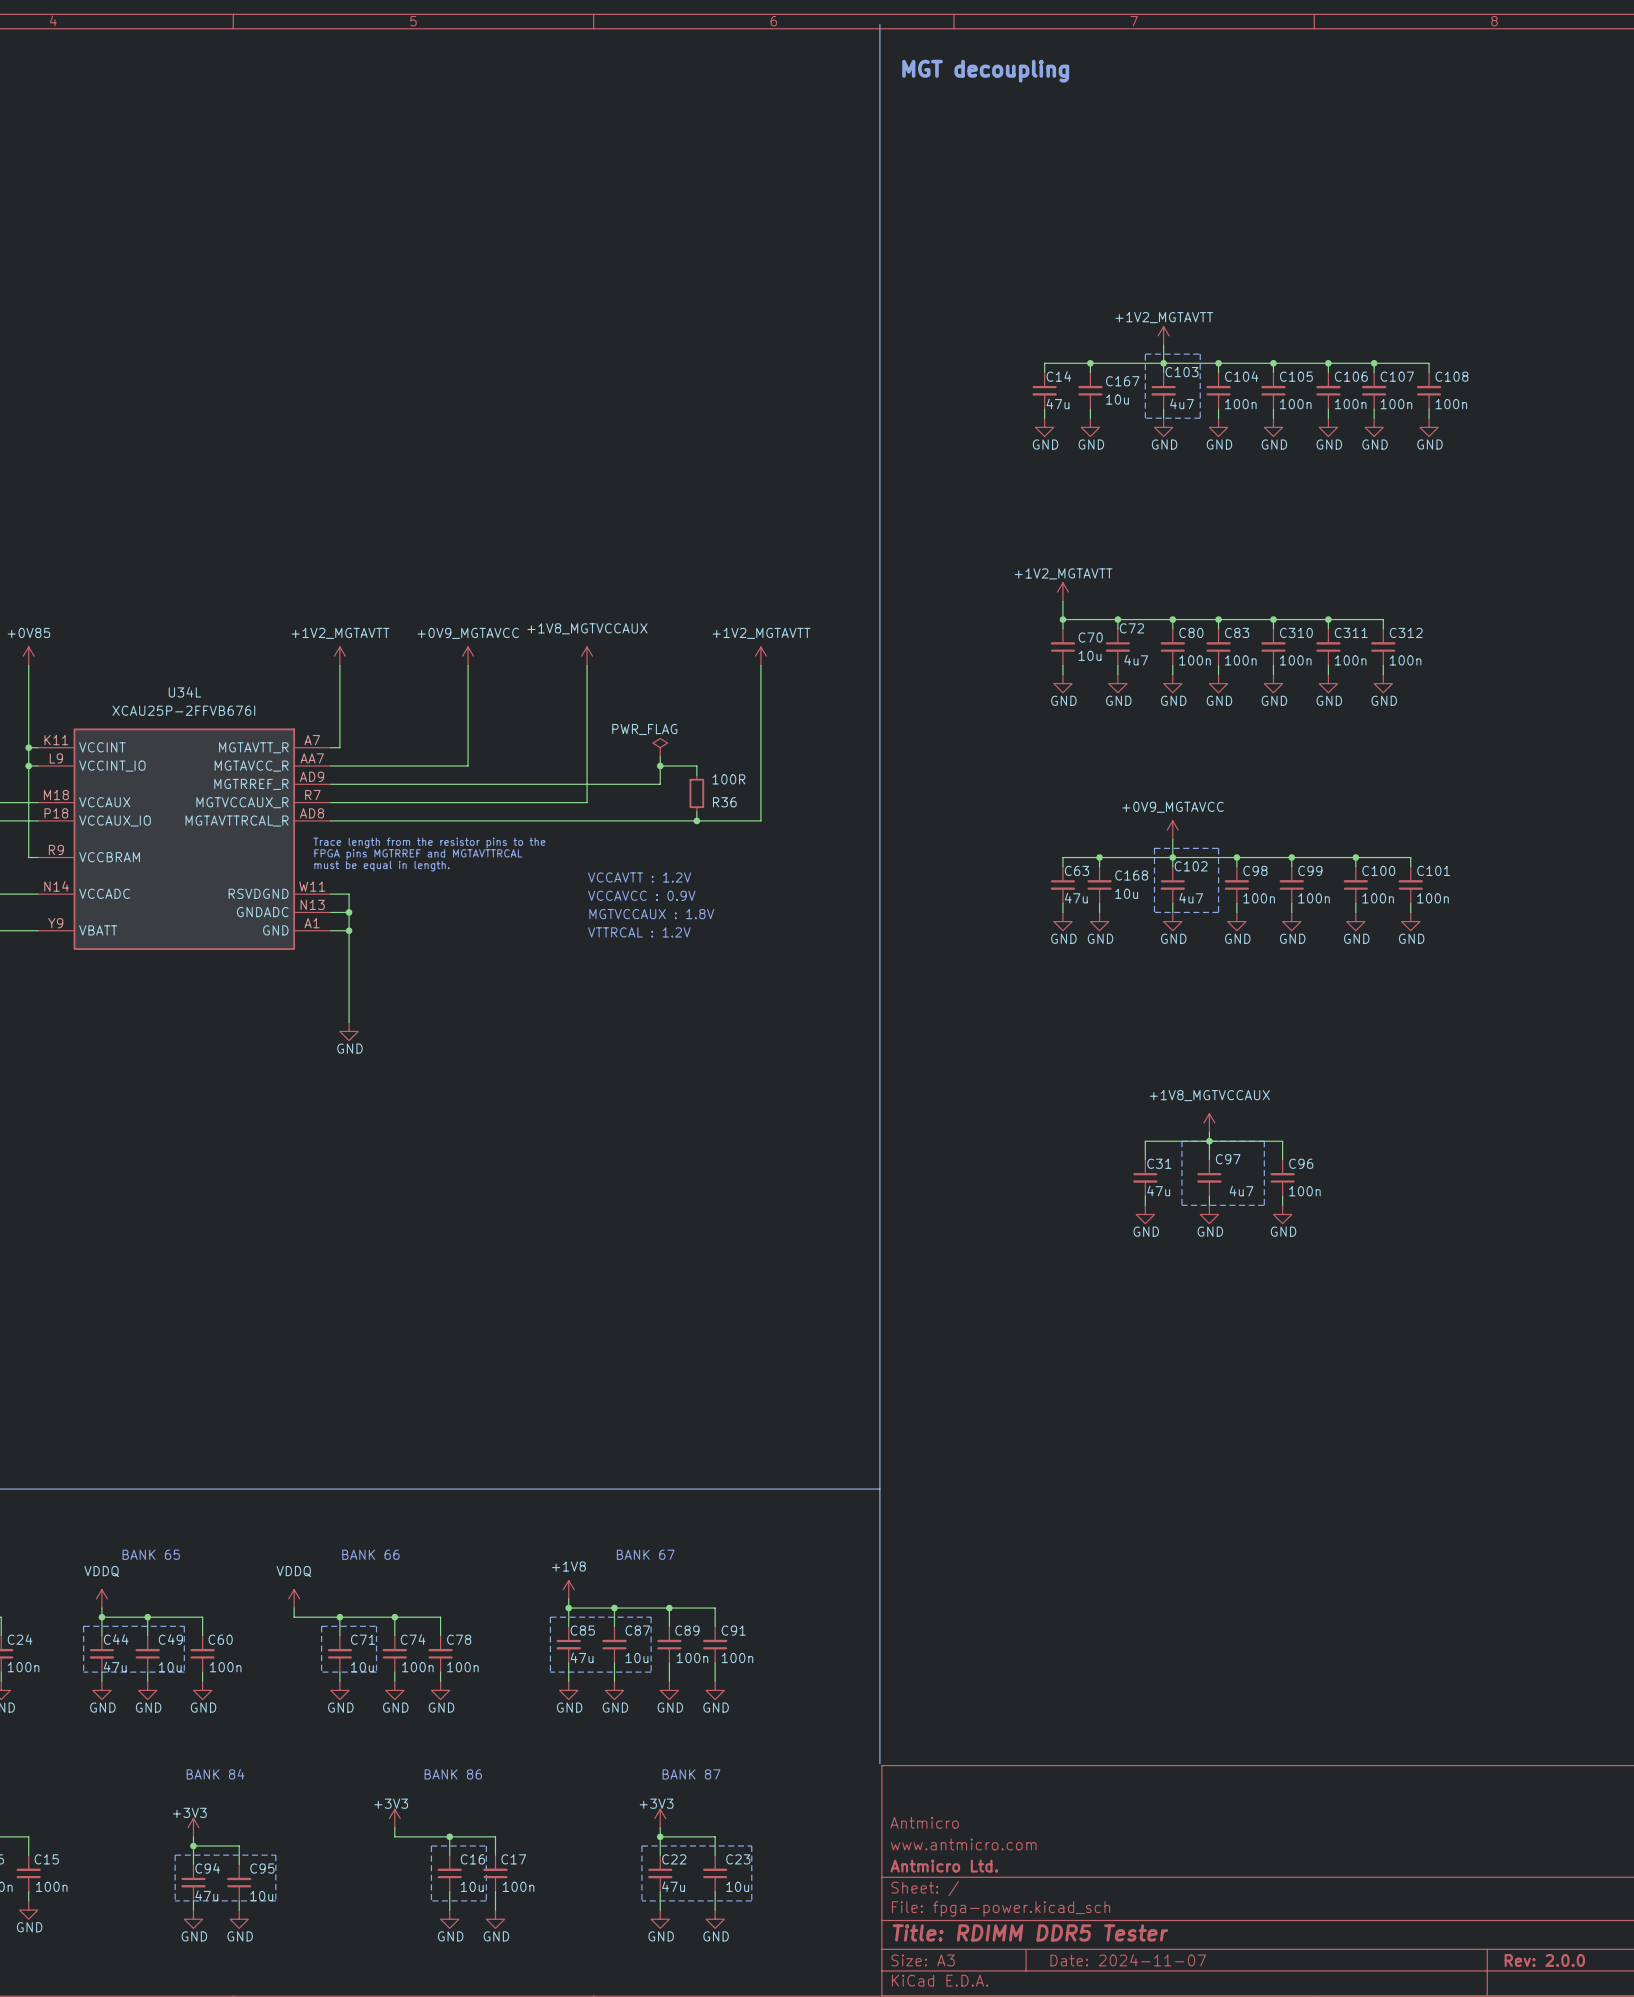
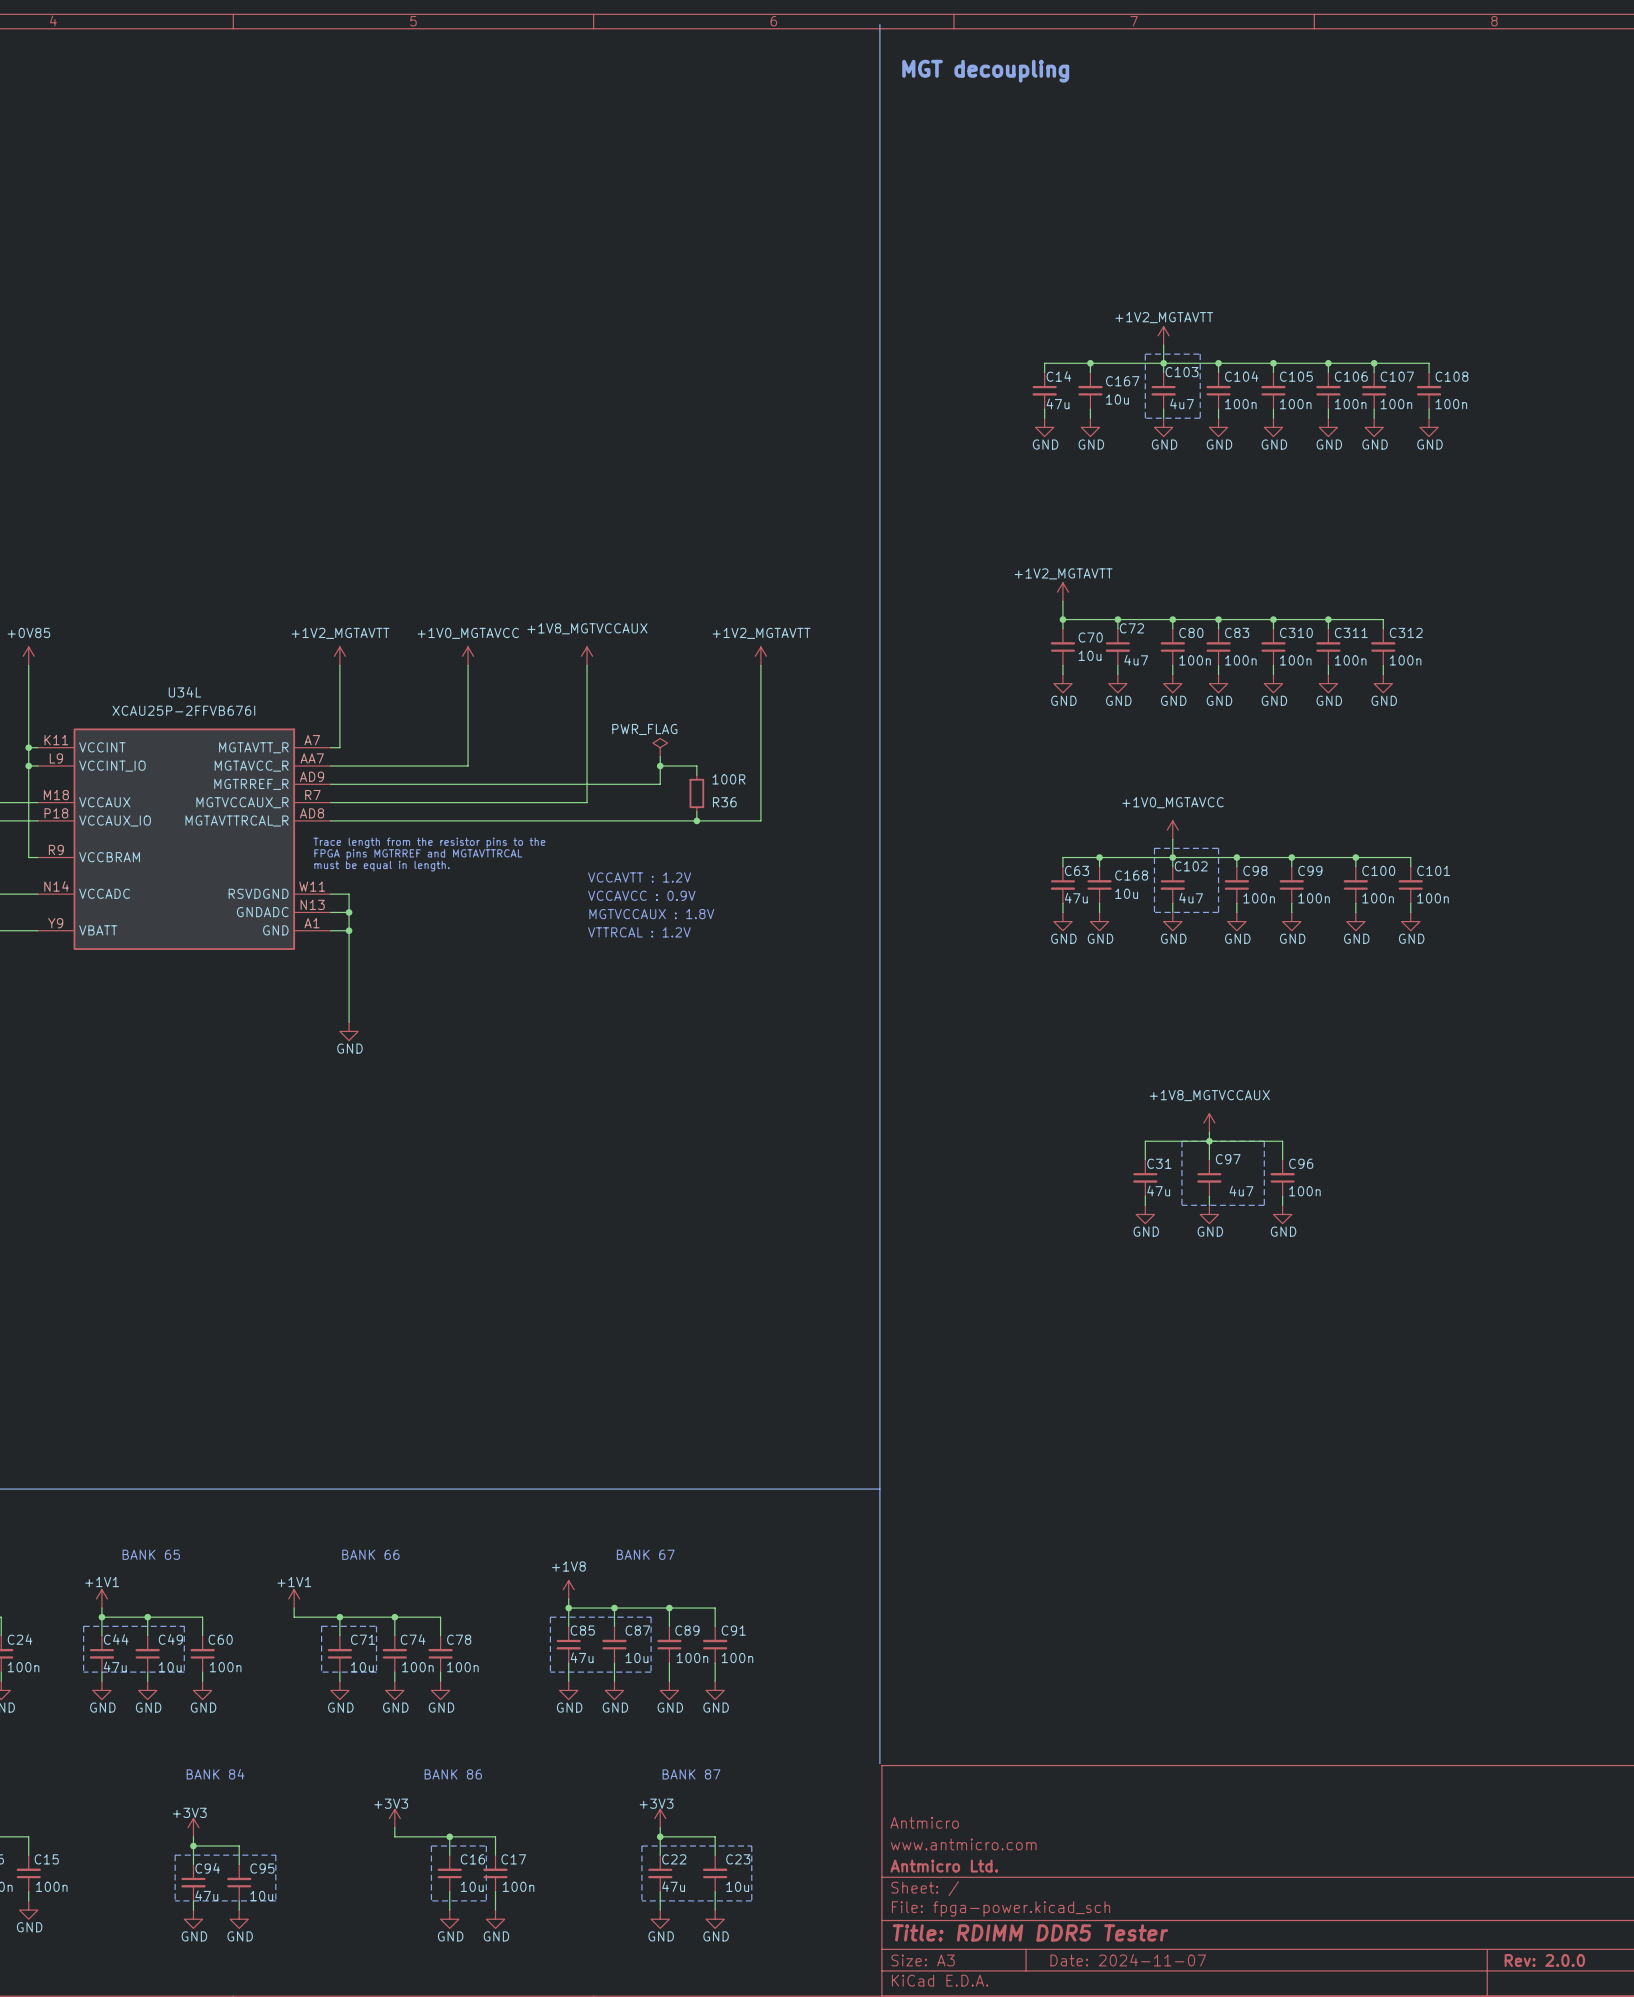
power symbol: +0V9_MGTAVCC (468, 656) -> +1V0_MGTAVCC (468, 656)
power symbol: +0V9_MGTAVCC (1172, 830) -> +1V0_MGTAVCC (1172, 830)
power symbol: VDDQ (101, 1598) -> +1V1 (101, 1598)
power symbol: VDDQ (294, 1598) -> +1V1 (294, 1598)

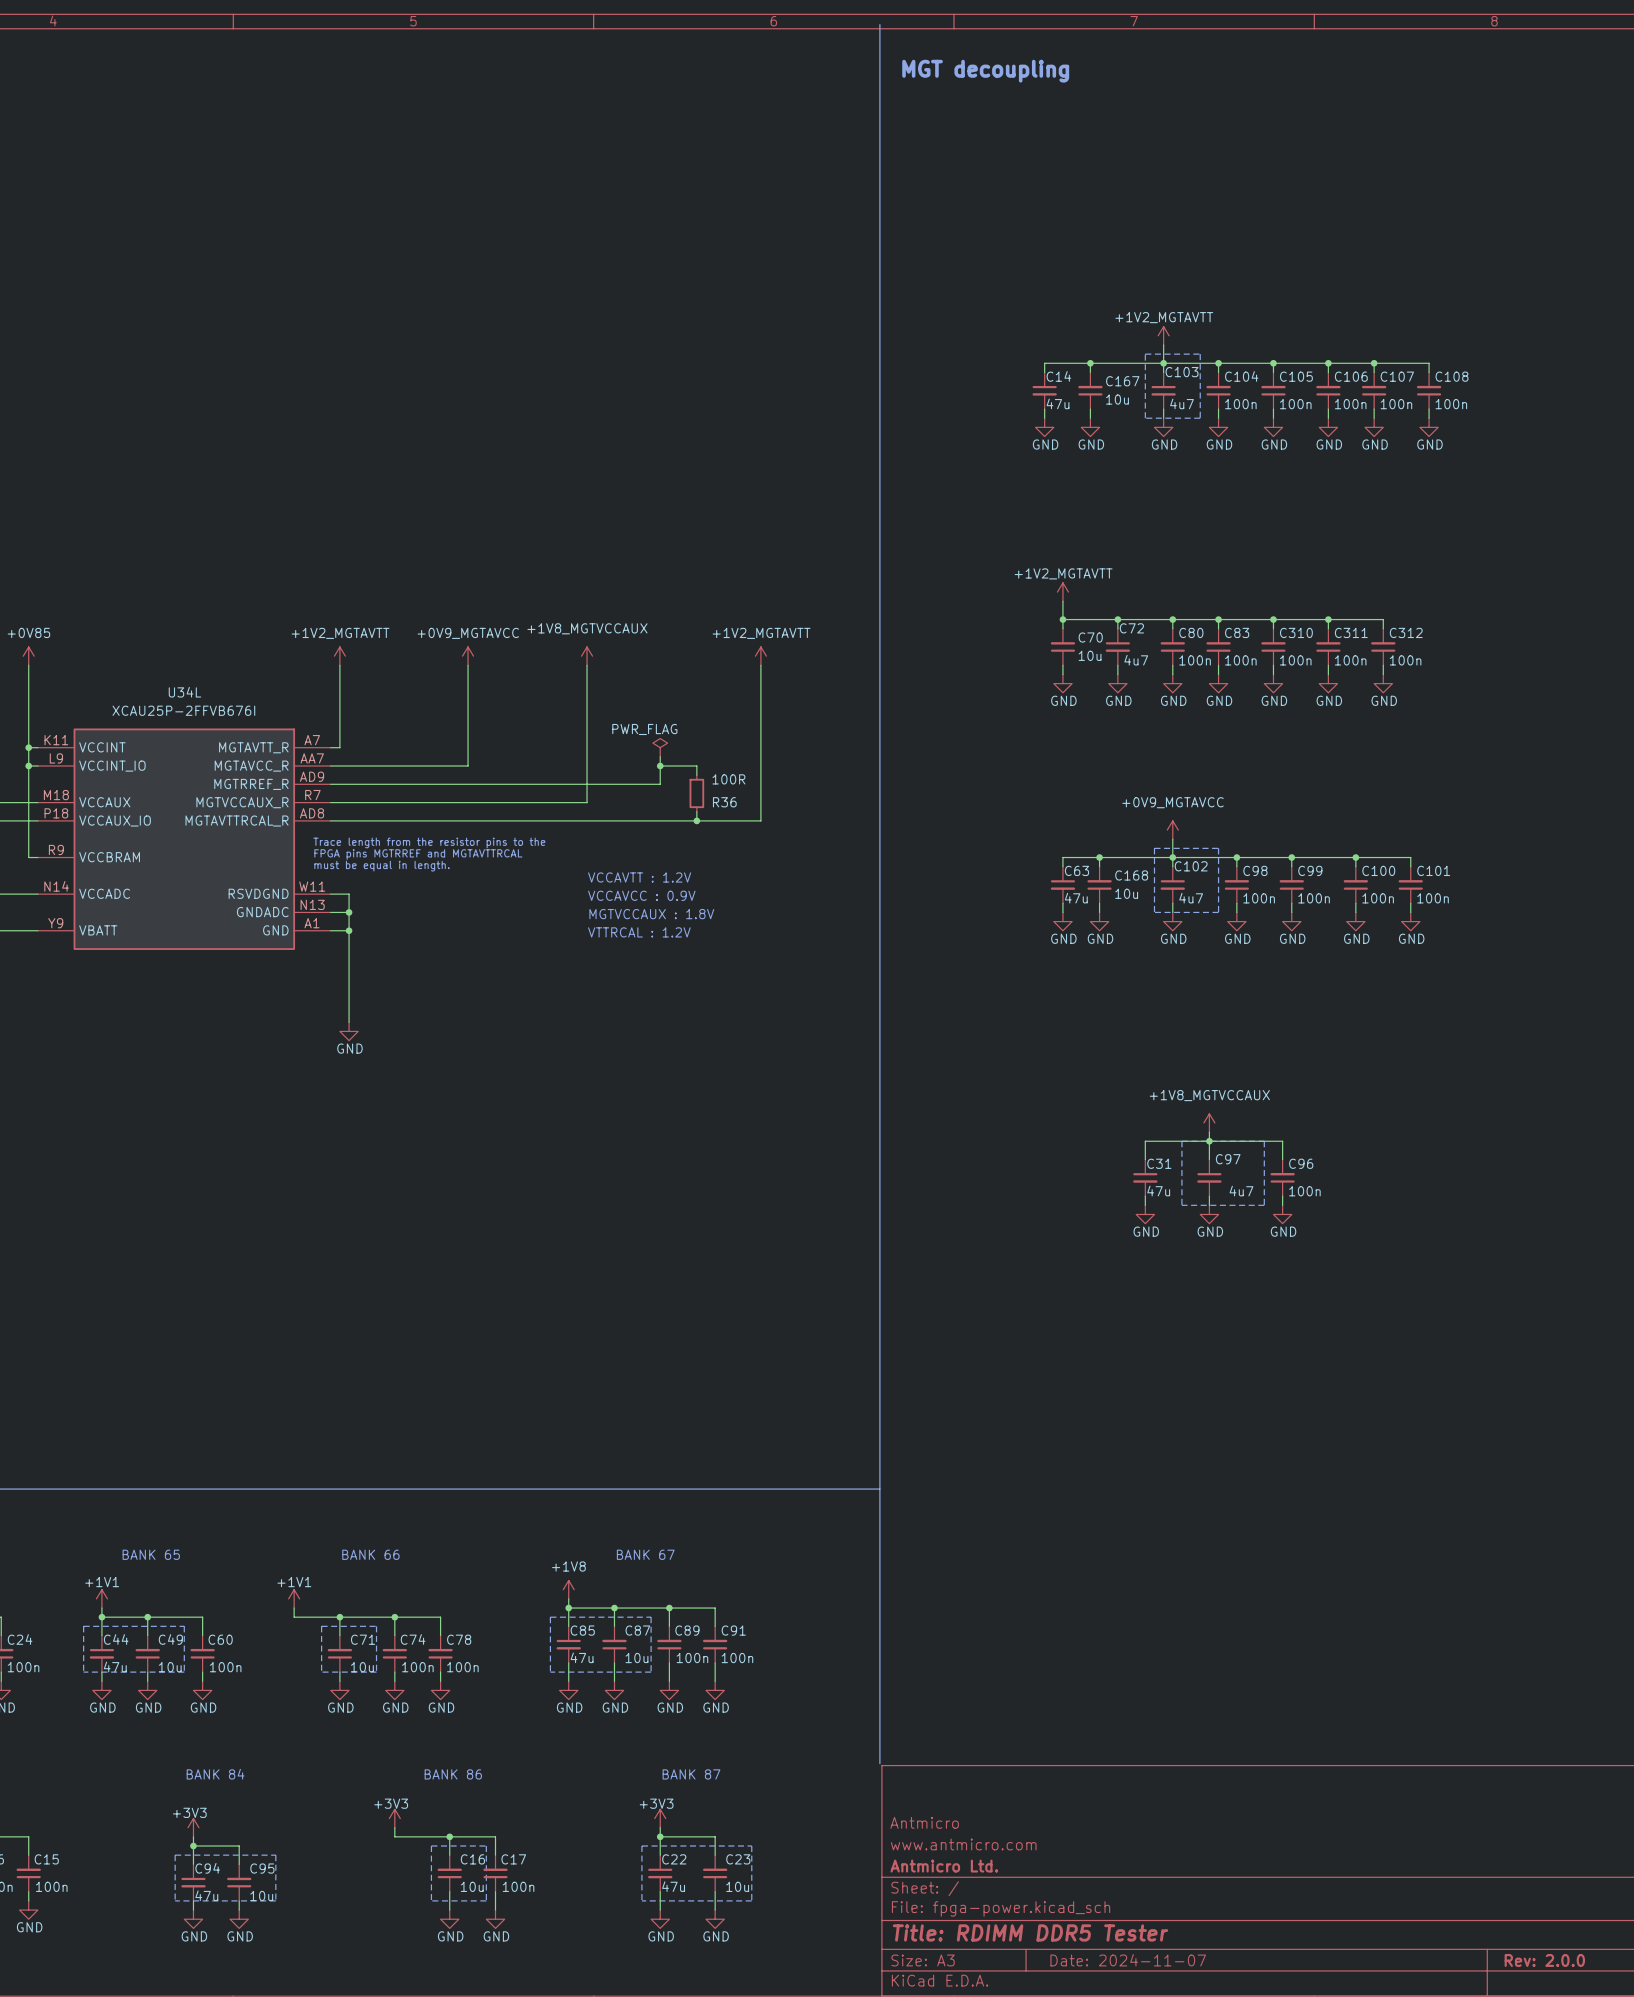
power symbol: +1V0_MGTAVCC (468, 656) -> +0V9_MGTAVCC (468, 656)
power symbol: +1V0_MGTAVCC (1172, 830) -> +0V9_MGTAVCC (1172, 830)

